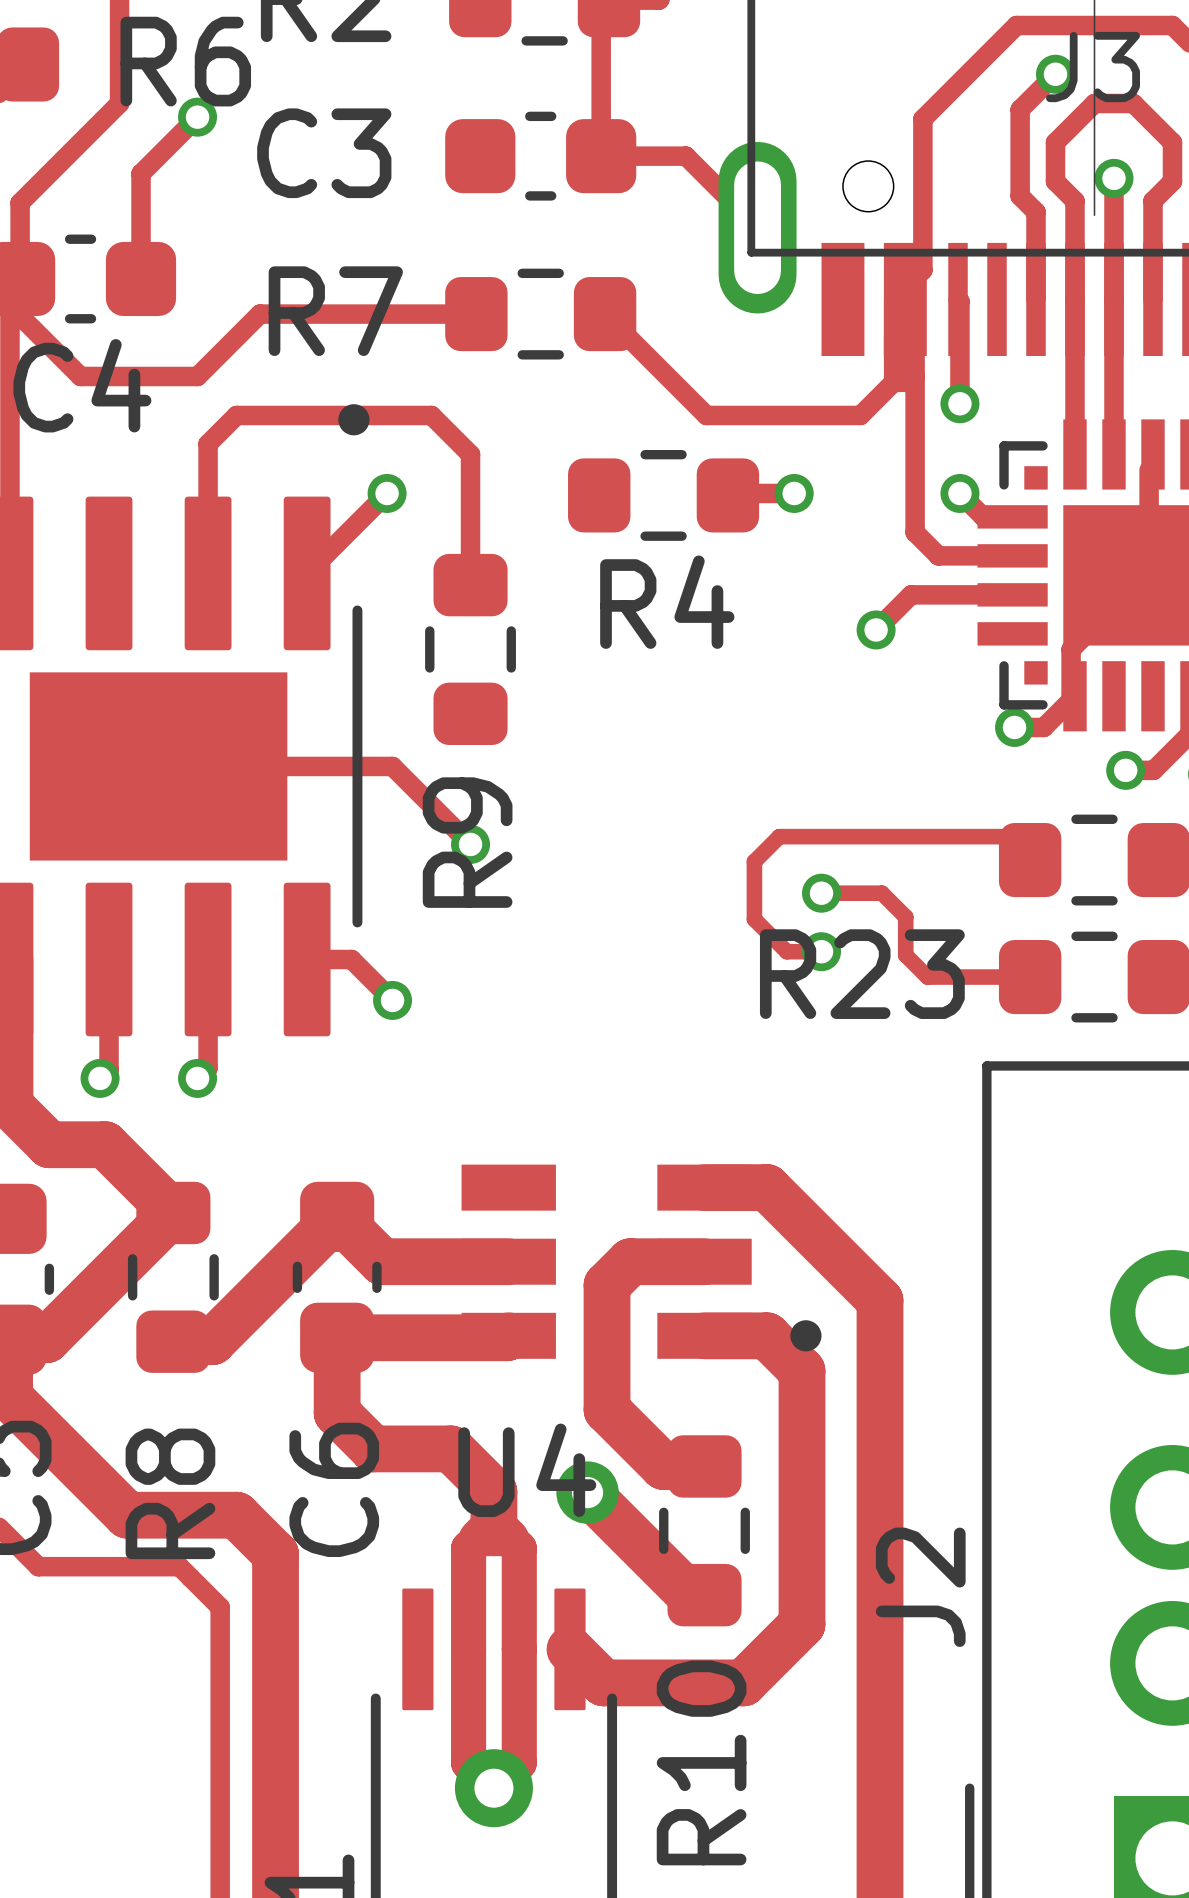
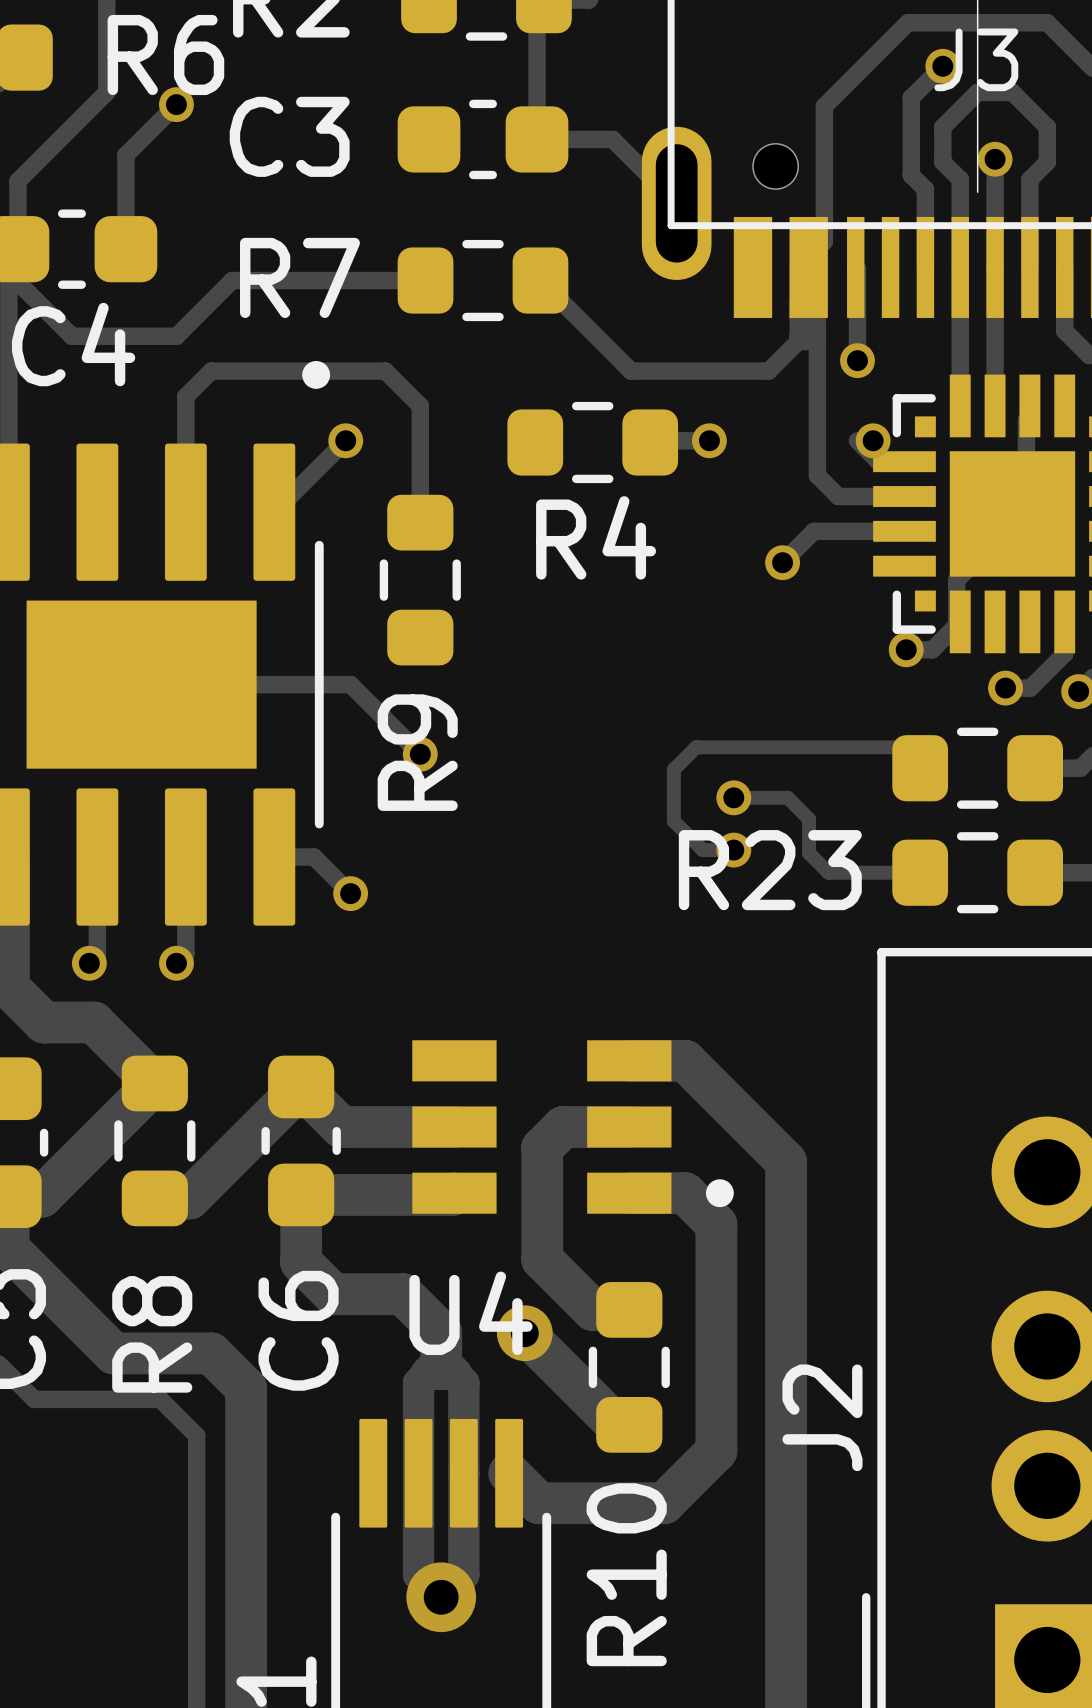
via position: (959, 493) -> (873, 440)

